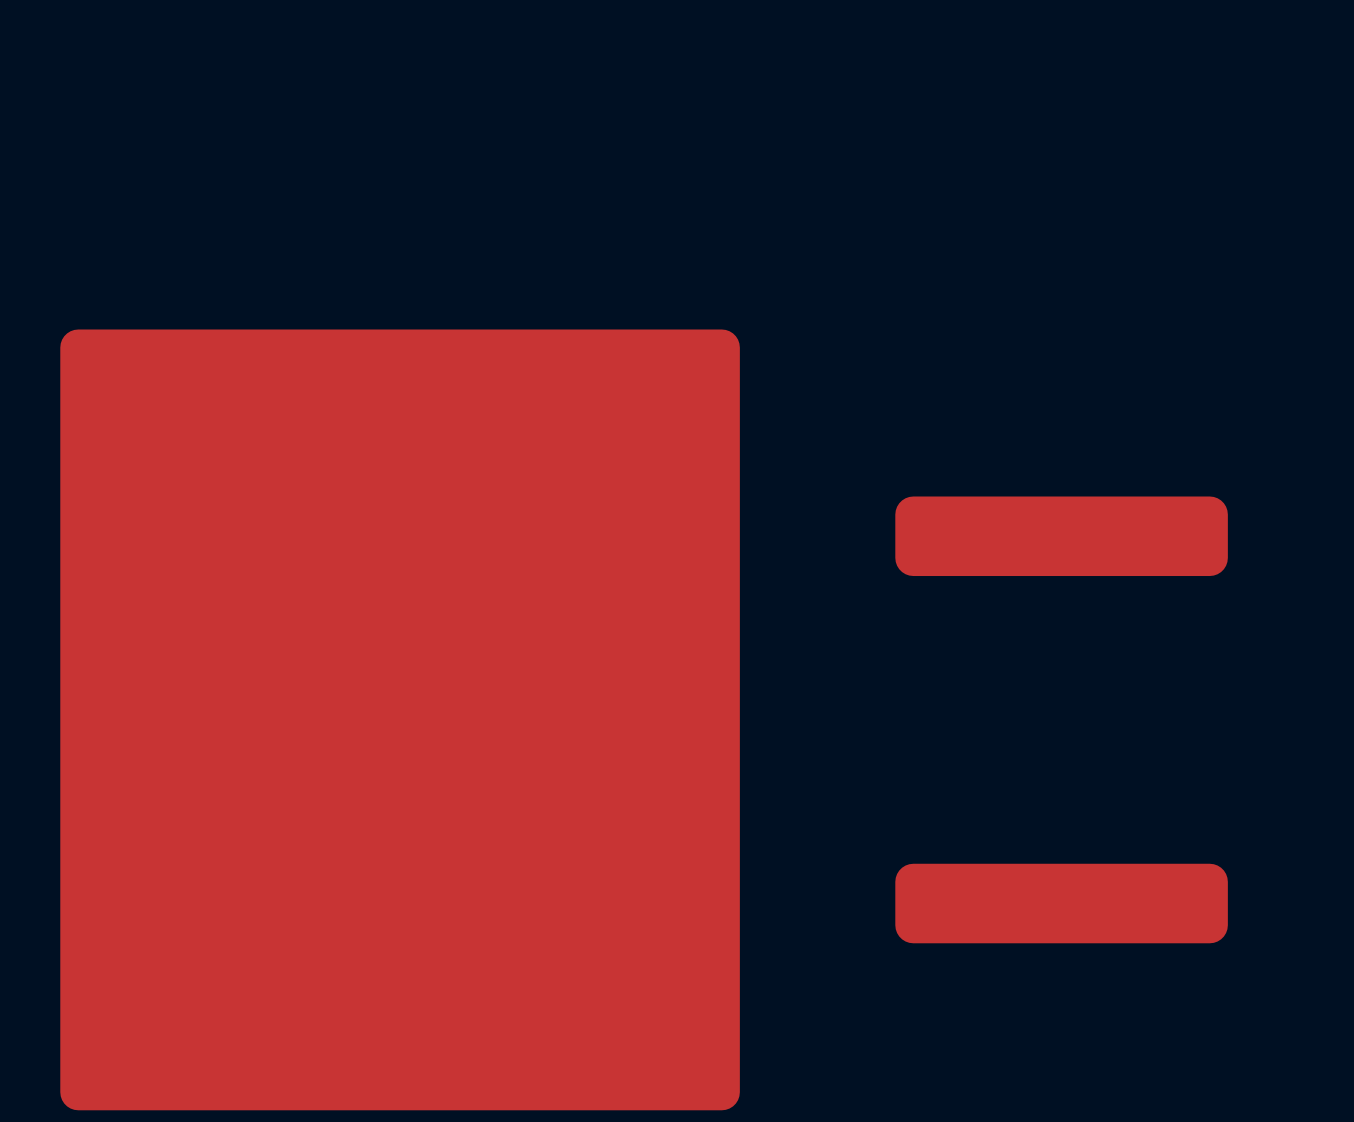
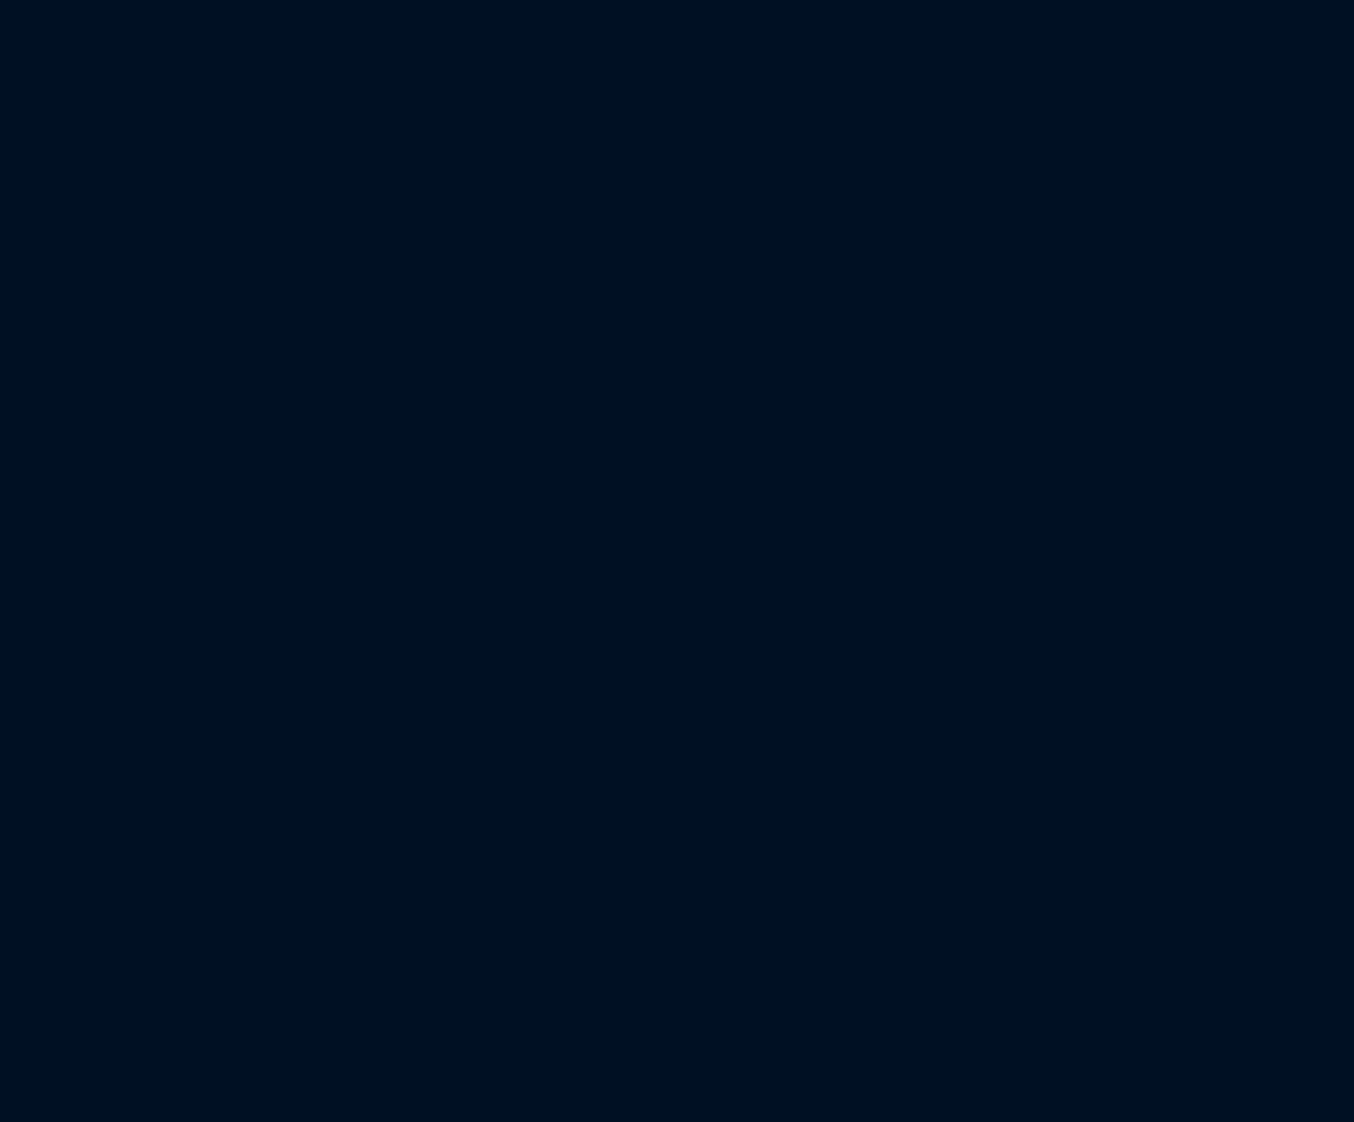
part: (644, 719) -> none

